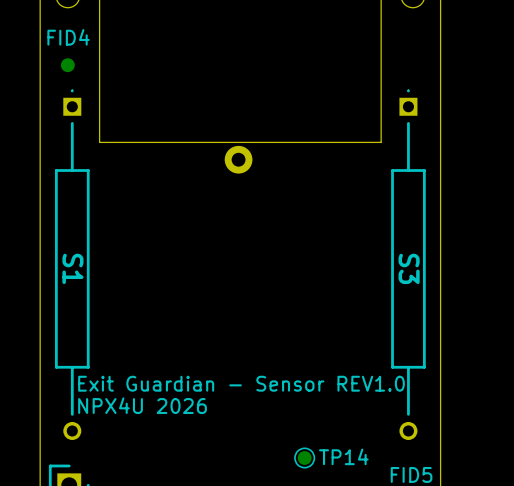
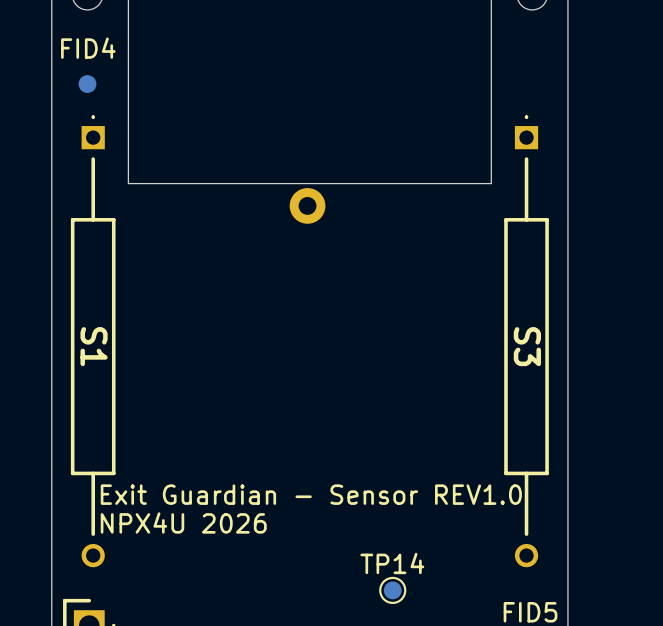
TP14 name position: TP14 (343, 456) -> TP14 (392, 563)

